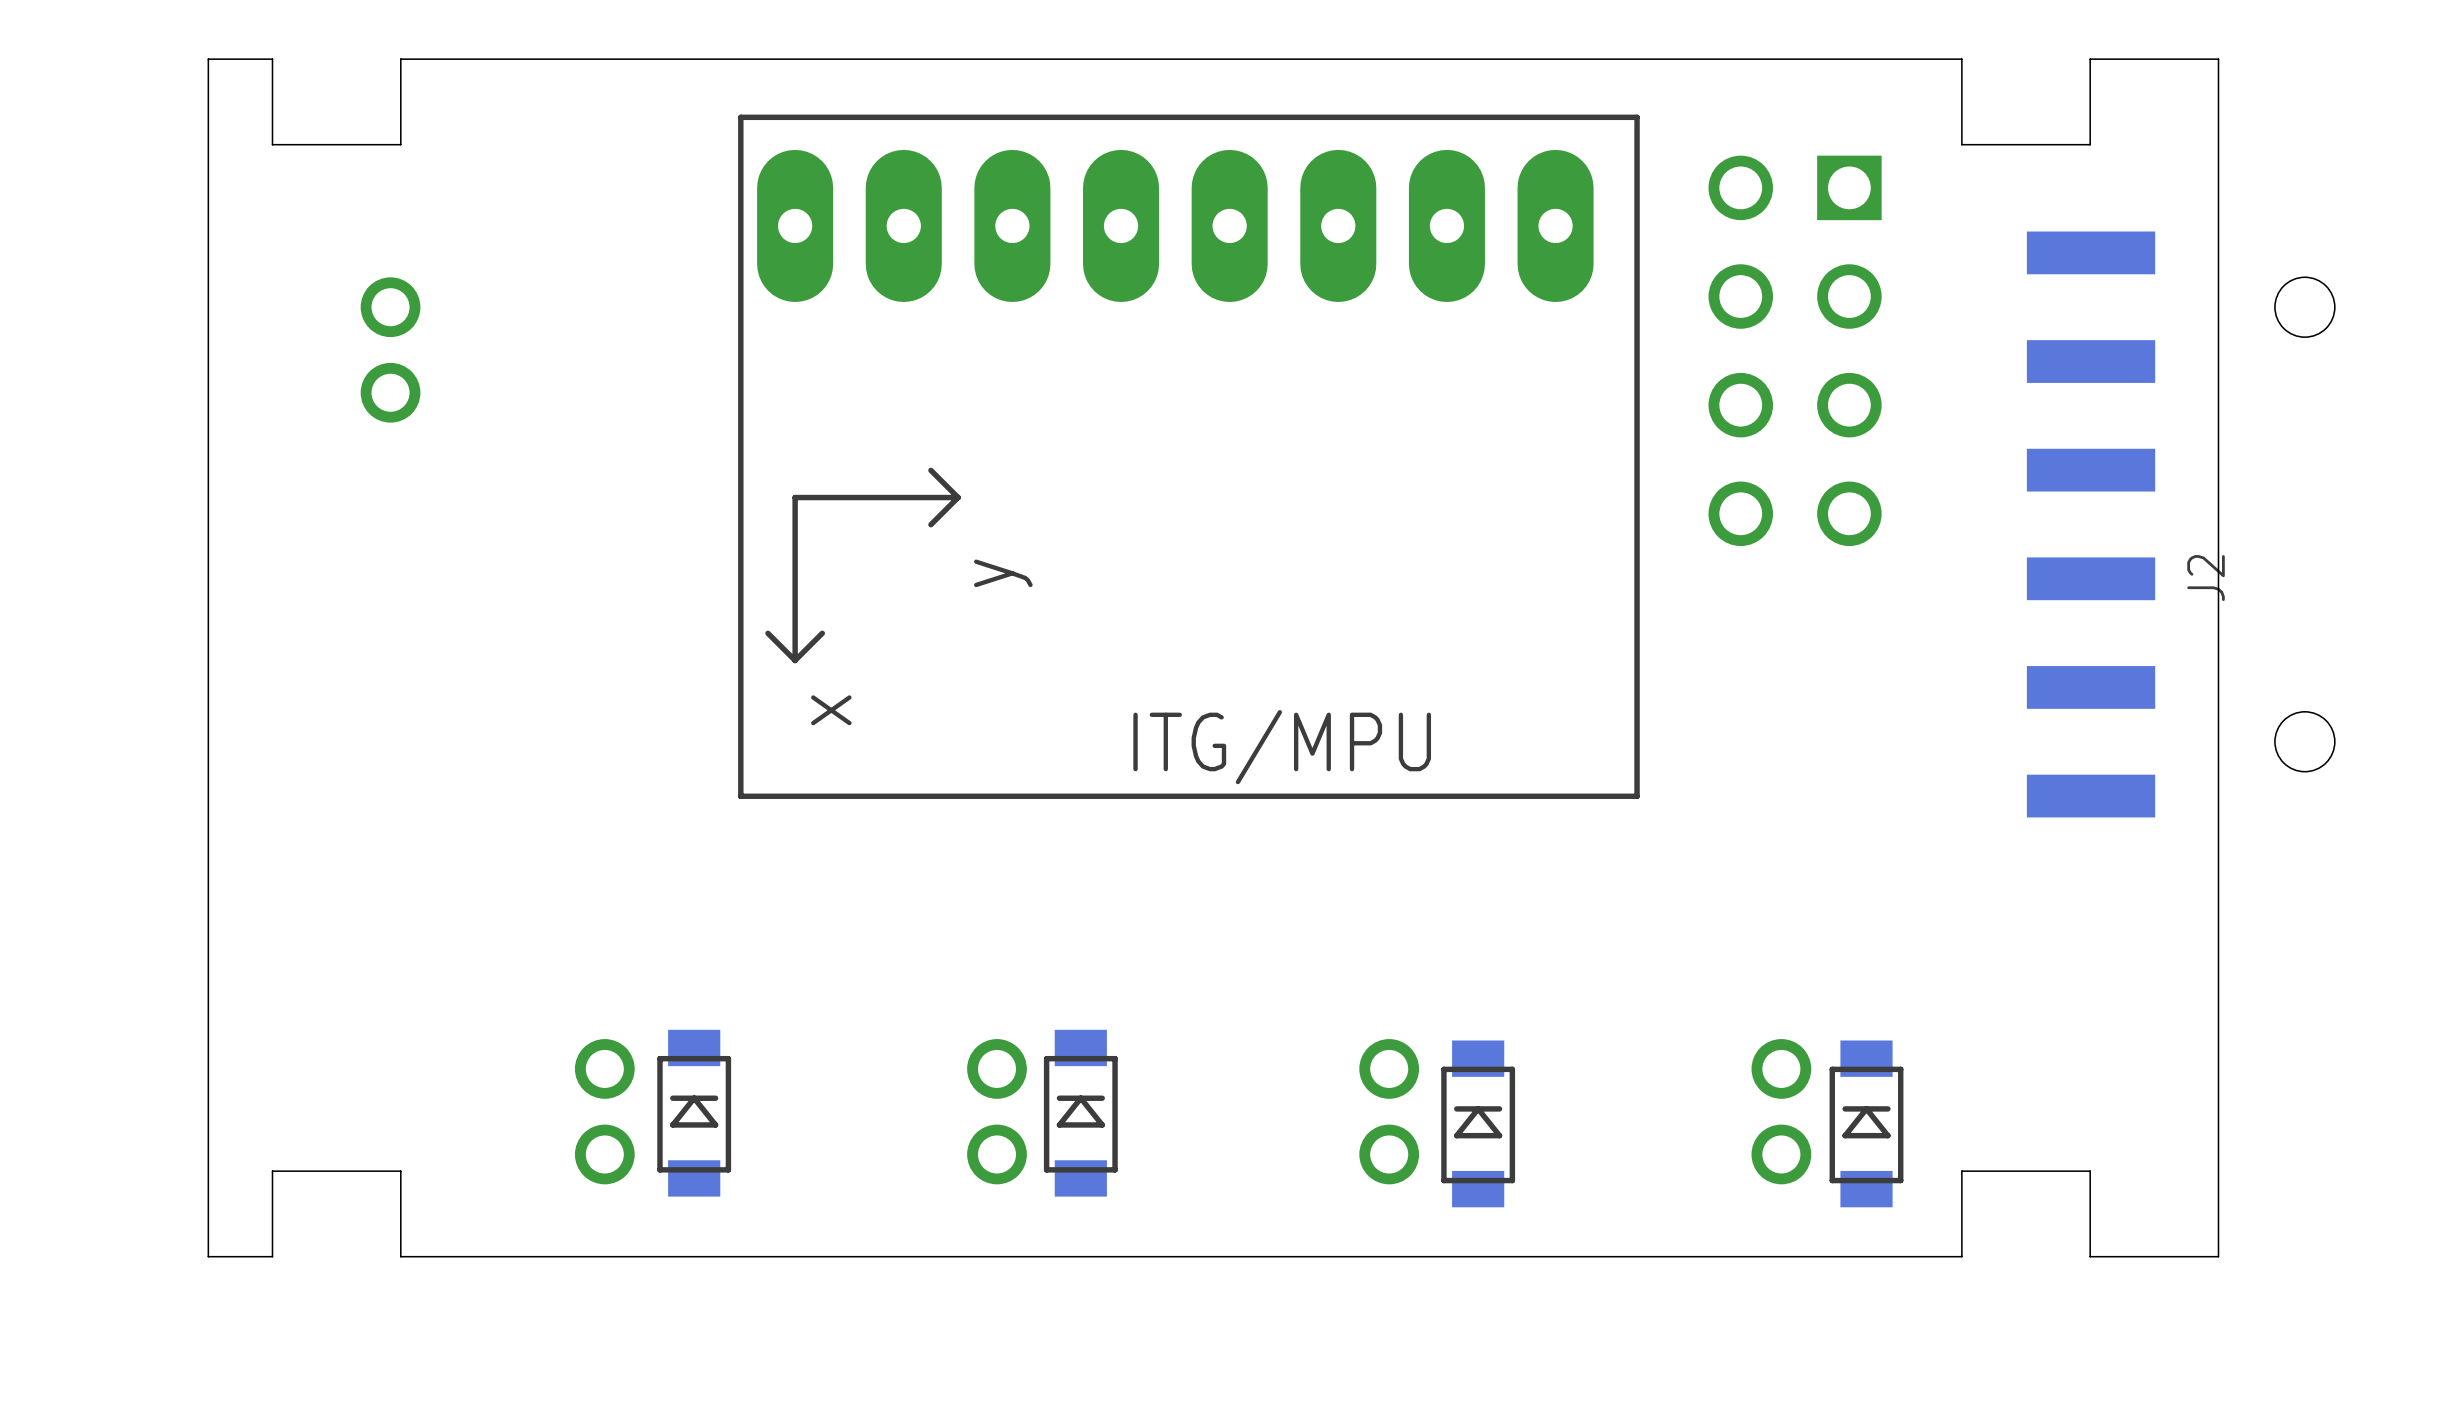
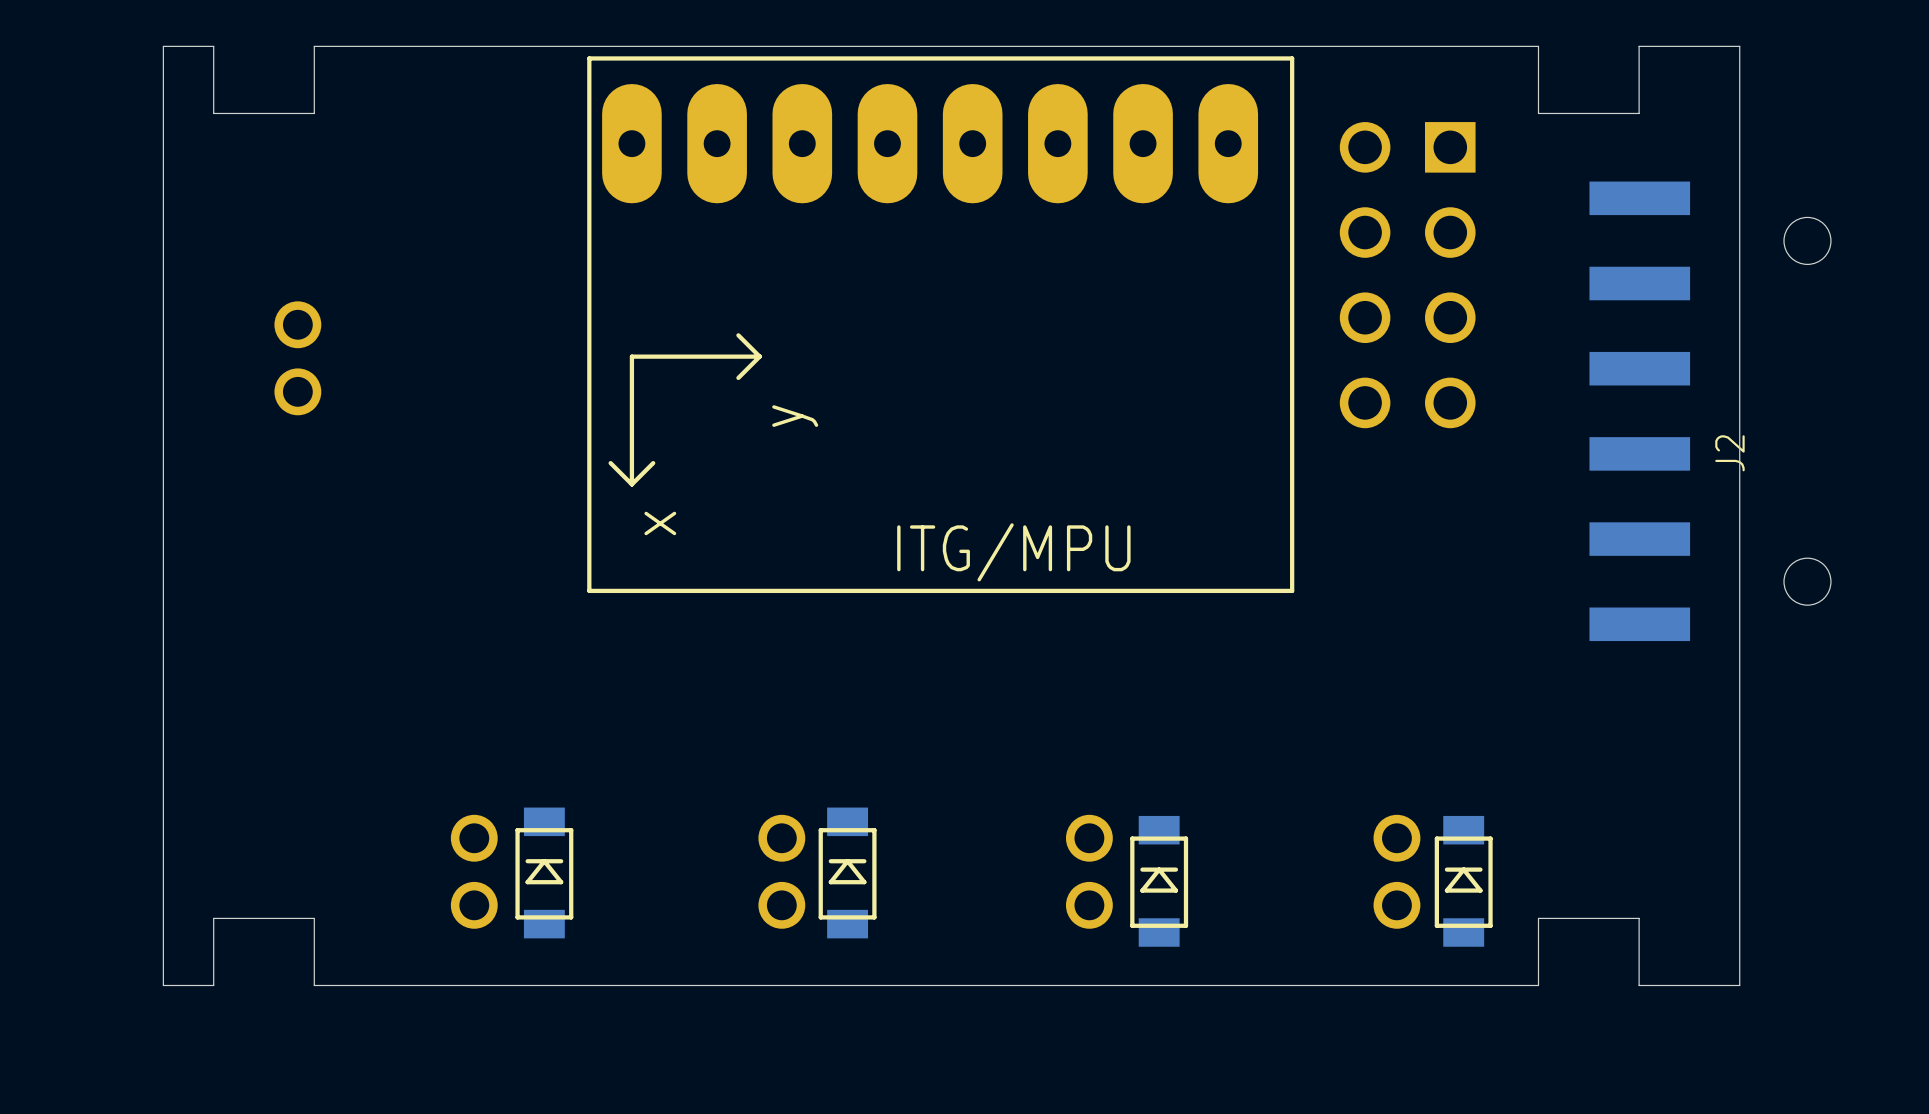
part position: (390, 349) -> (297, 358)
part position: (1188, 456) -> (940, 324)

